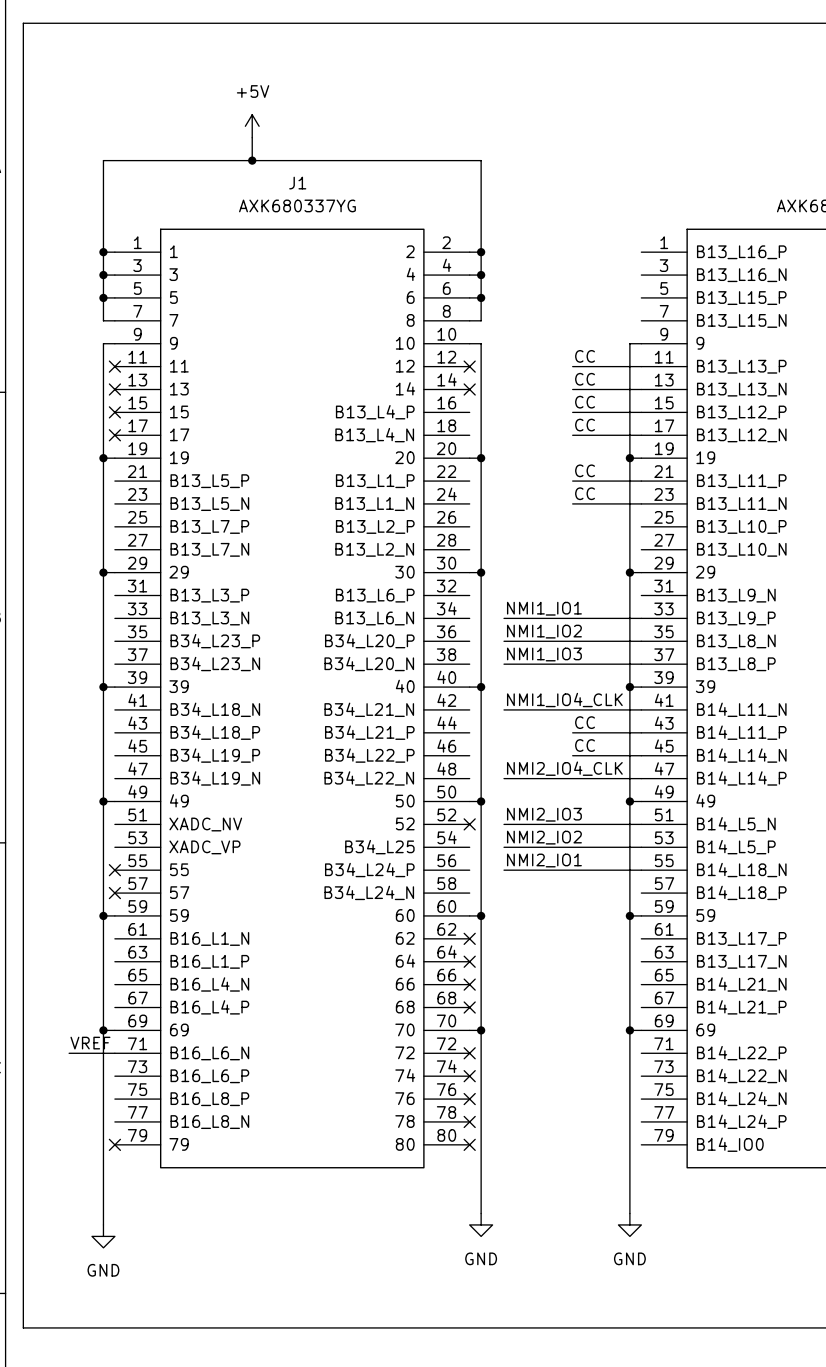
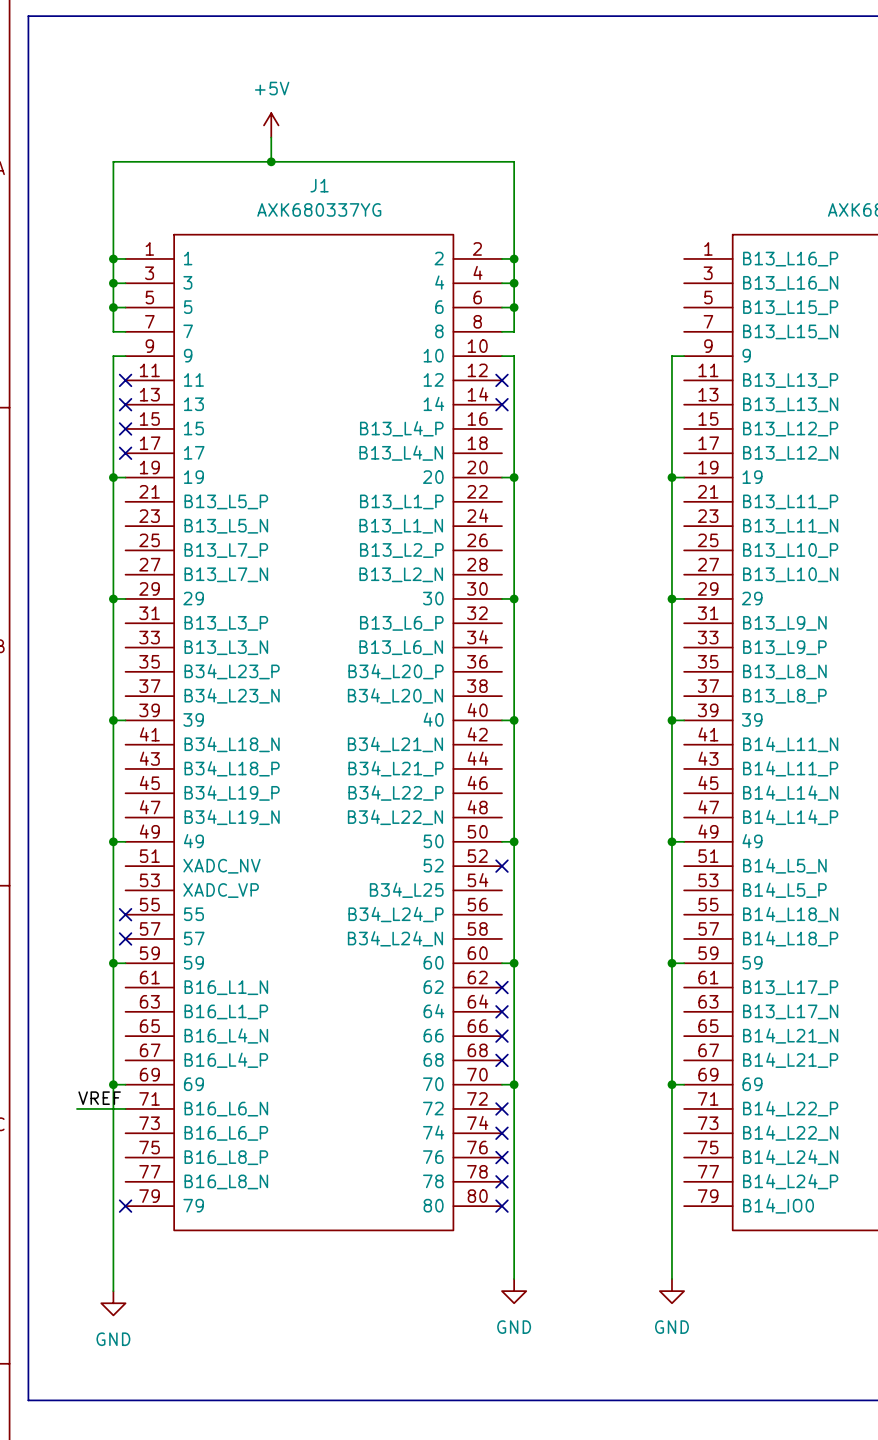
label: CC (585, 356) -> none
wire: (572, 366) (641, 366) -> none
label: CC (585, 379) -> none
wire: (572, 389) (641, 389) -> none
label: CC (585, 402) -> none
wire: (572, 412) (641, 412) -> none
label: CC (585, 425) -> none
wire: (572, 435) (641, 435) -> none
label: CC (585, 470) -> none
wire: (572, 481) (641, 481) -> none
label: CC (585, 493) -> none
wire: (572, 503) (641, 503) -> none
label: NMI1_IO1 (544, 608) -> none
wire: (504, 618) (641, 618) -> none
label: NMI1_IO2 (544, 631) -> none
wire: (504, 641) (641, 641) -> none
label: NMI1_IO3 (544, 654) -> none
wire: (504, 664) (641, 664) -> none
label: NMI1_IO4_CLK (564, 700) -> none
wire: (504, 709) (641, 709) -> none
label: CC (585, 722) -> none
wire: (572, 732) (641, 732) -> none
label: CC (585, 745) -> none
wire: (572, 755) (641, 755) -> none
label: NMI2_IO4_CLK (564, 768) -> none
wire: (504, 778) (641, 778) -> none
label: NMI2_IO3 (544, 814) -> none
wire: (504, 824) (641, 824) -> none
label: NMI2_IO2 (544, 837) -> none
wire: (504, 847) (641, 847) -> none
label: NMI2_IO1 (544, 860) -> none
wire: (504, 870) (641, 870) -> none

